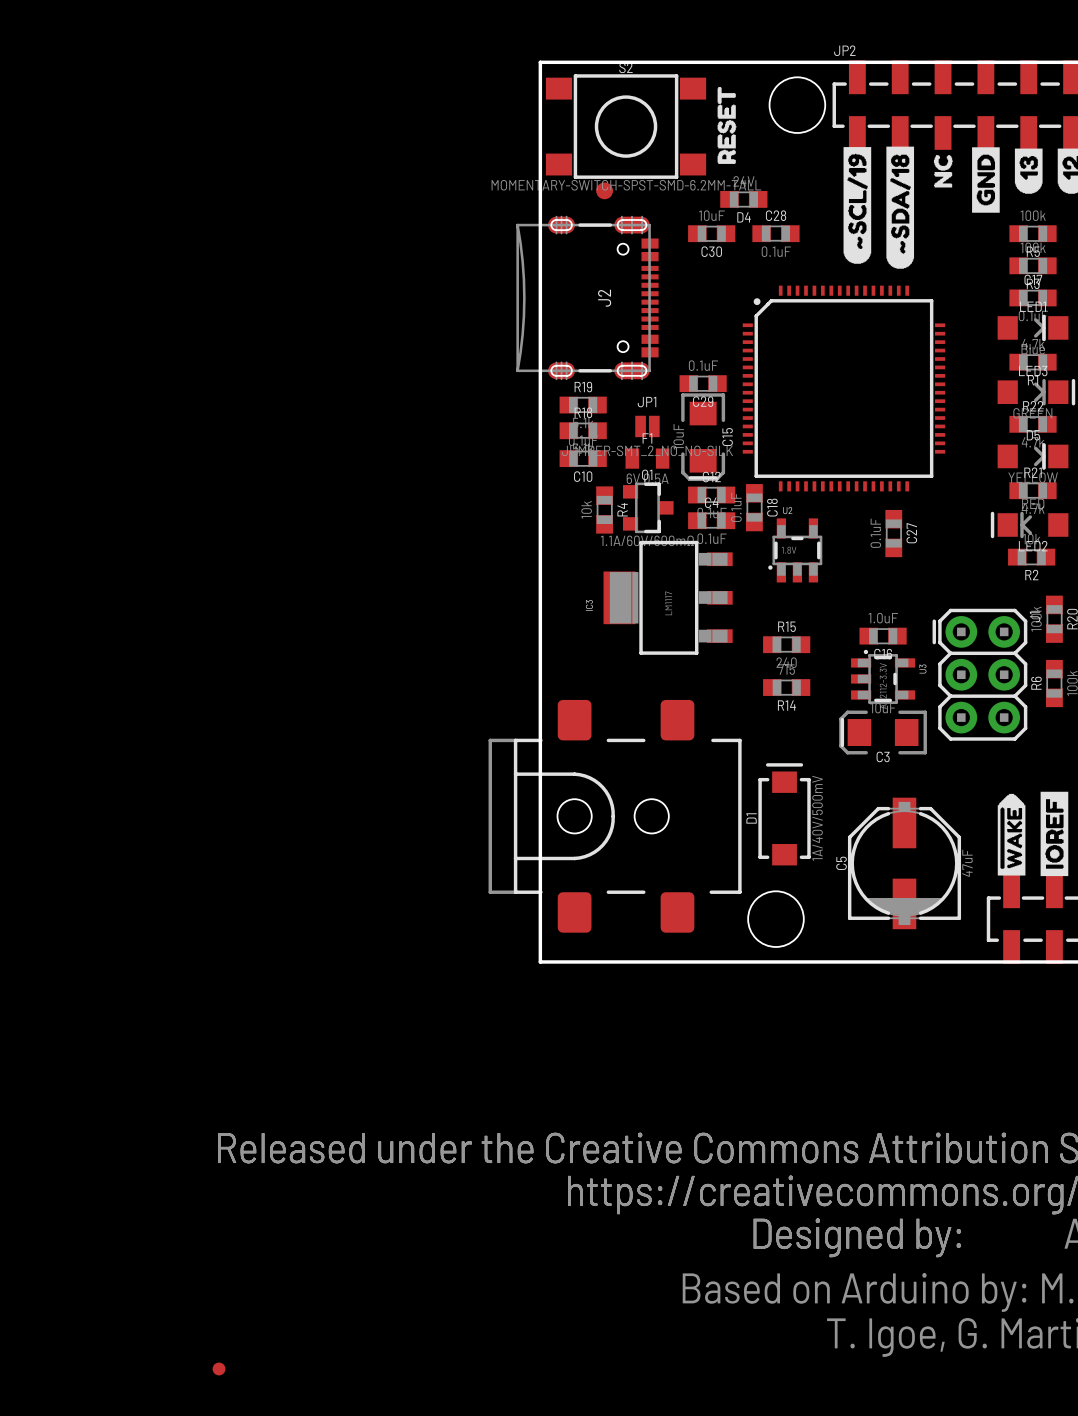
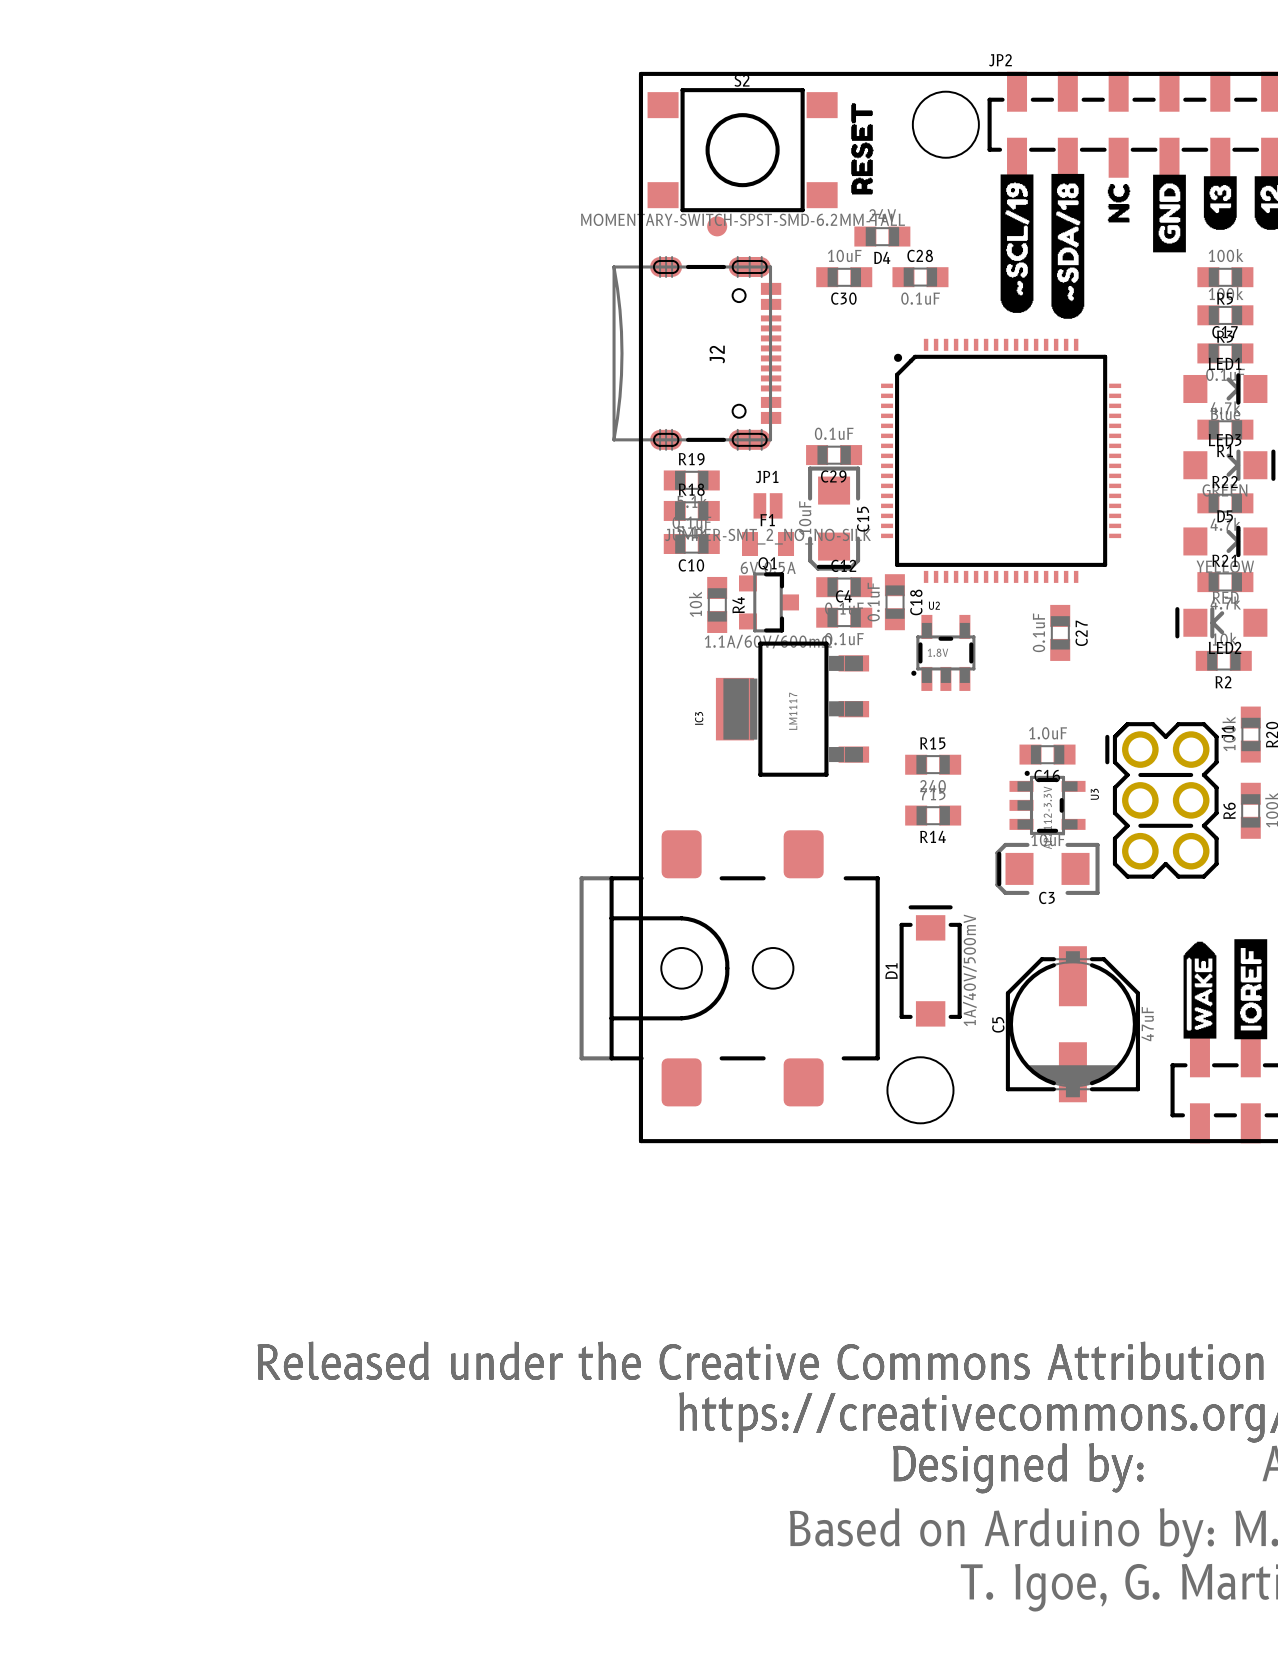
J1 footprint: [932, 608, 1028, 741] -> [1105, 722, 1219, 879]
part: (219, 1368) -> none

